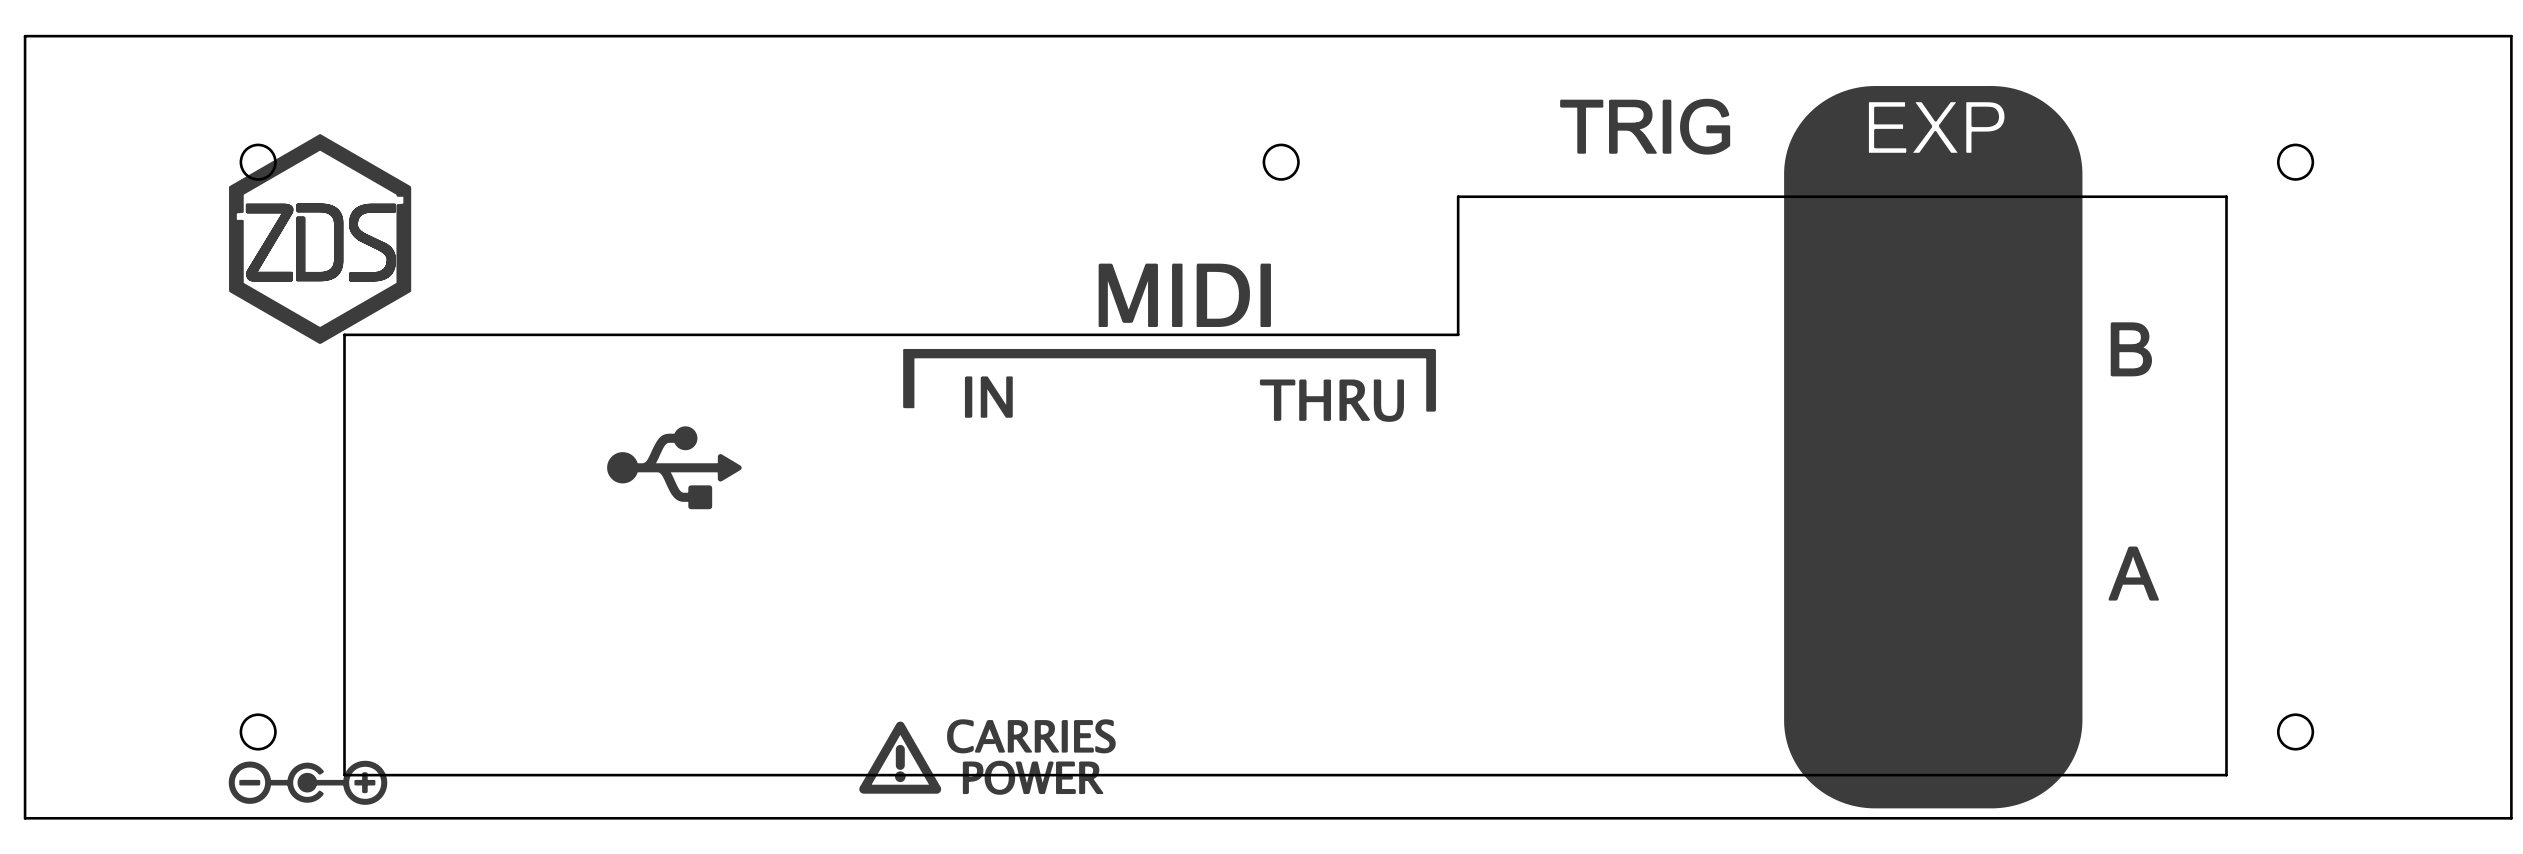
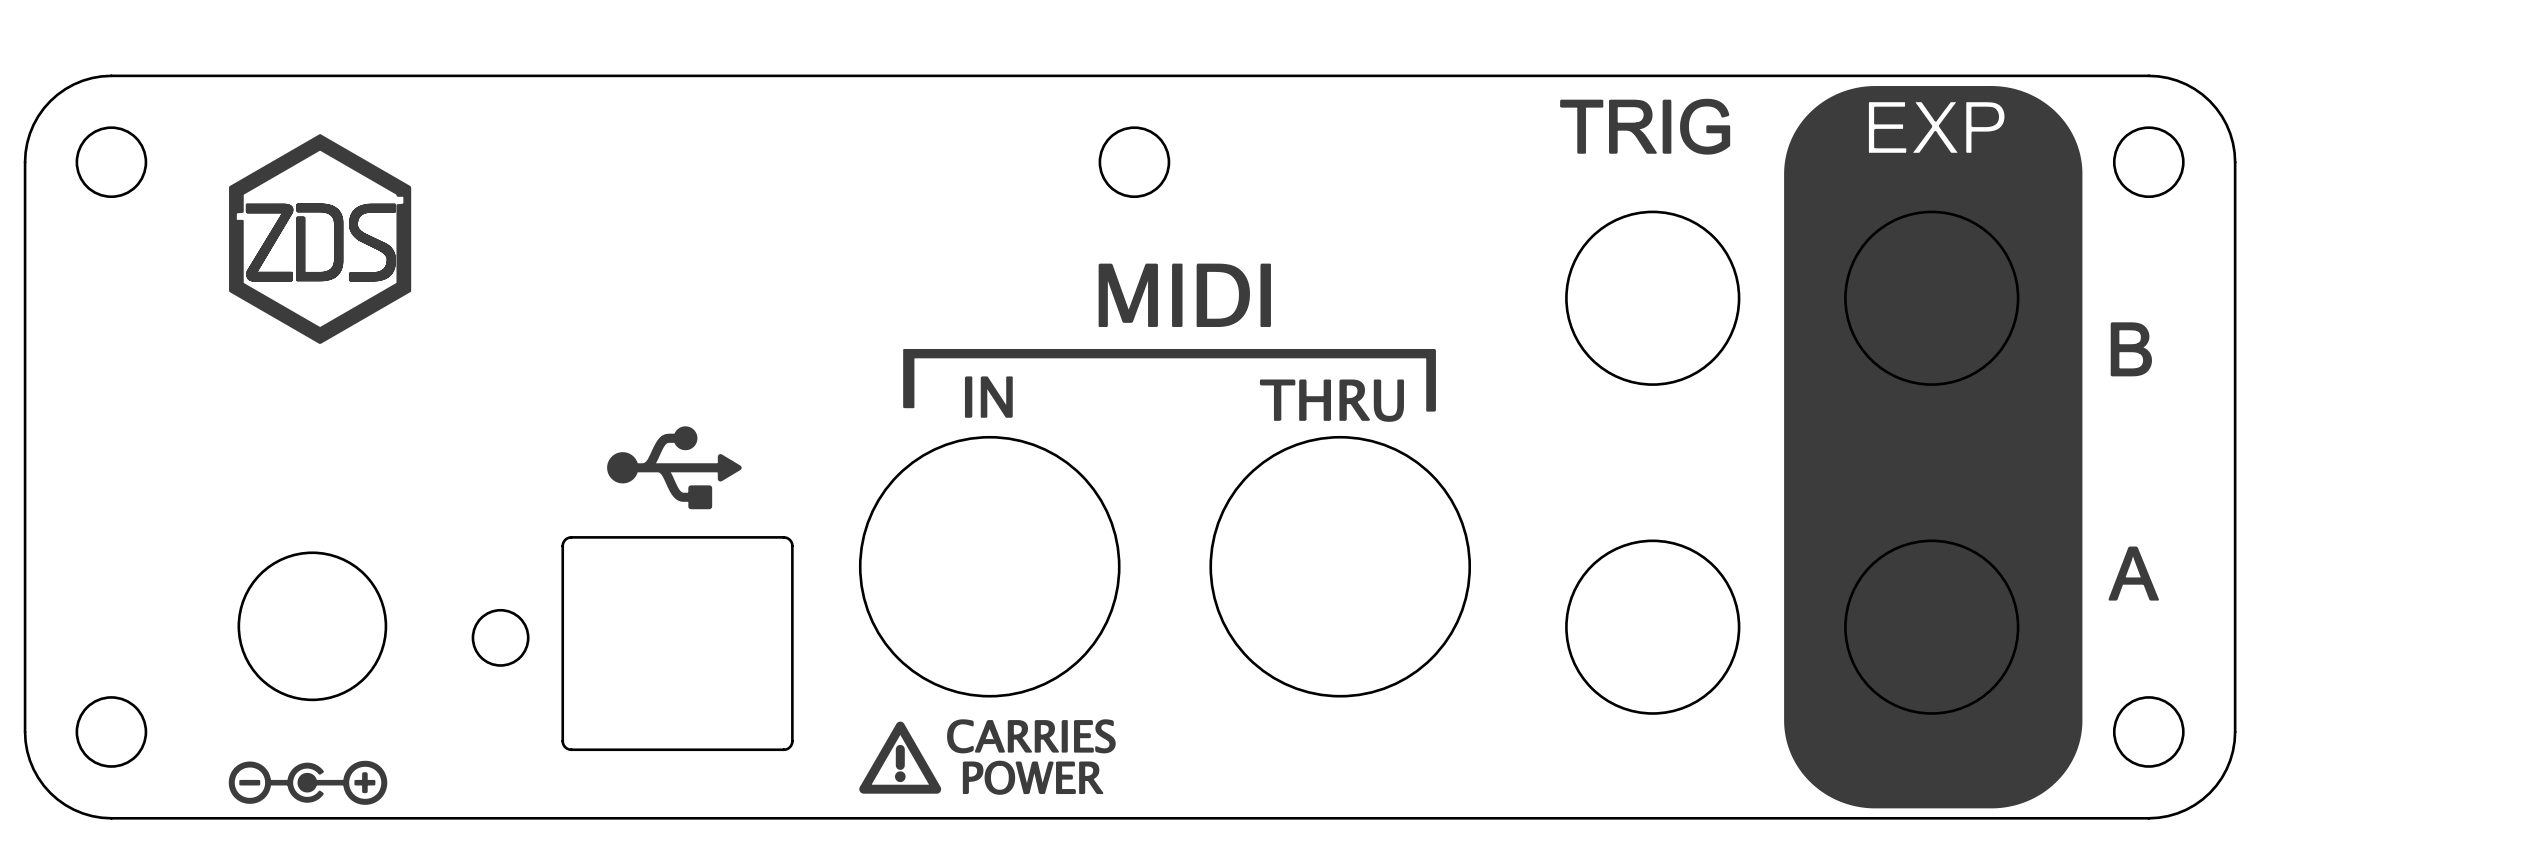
round board edge: none -> [75, 126, 148, 199]
round board edge: none -> [1098, 126, 1171, 199]
round board edge: none -> [2112, 126, 2185, 199]
round board edge: [239, 143, 277, 181] -> none
round board edge: [1262, 143, 1300, 181] -> none
round board edge: [2276, 143, 2315, 181] -> none
board edge: (25, 162) (25, 36) (2511, 36) (2511, 818) (2148, 818) -> (25, 162) (29, 133) (38, 116) (50, 101) (65, 89) (82, 80) (111, 75) (2148, 75) (2177, 80) (2202, 94) (2216, 108) (2230, 133) (2234, 152) (2235, 731) (2230, 760) (2221, 777) (2209, 793) (2194, 805) (2177, 813) (2148, 818)
board edge: (1458, 196) (1458, 334) (344, 334) (344, 775) (2226, 775) (2226, 196) (1458, 196) -> none
round board edge: none -> [1565, 210, 1741, 386]
round board edge: none -> [1844, 210, 2020, 386]
round board edge: none -> [858, 435, 1121, 698]
round board edge: none -> [1209, 435, 1472, 698]
board edge: none -> (571, 537) (783, 537) (789, 539) (792, 546) (792, 741) (789, 747) (783, 749) (571, 749) (565, 747) (562, 741) (562, 546) (565, 539) (571, 537)
round board edge: none -> [1565, 539, 1741, 715]
round board edge: none -> [1844, 539, 2020, 715]
round board edge: none -> [237, 551, 388, 702]
round board edge: none -> [471, 608, 530, 667]
round board edge: none -> [75, 696, 148, 768]
round board edge: none -> [2112, 696, 2185, 768]
round board edge: [239, 713, 277, 751] -> none
round board edge: [2276, 713, 2315, 751] -> none
board edge: (25, 731) (25, 818) (111, 818) -> (25, 731) (29, 760) (38, 777) (50, 793) (65, 805) (82, 813) (111, 818)

